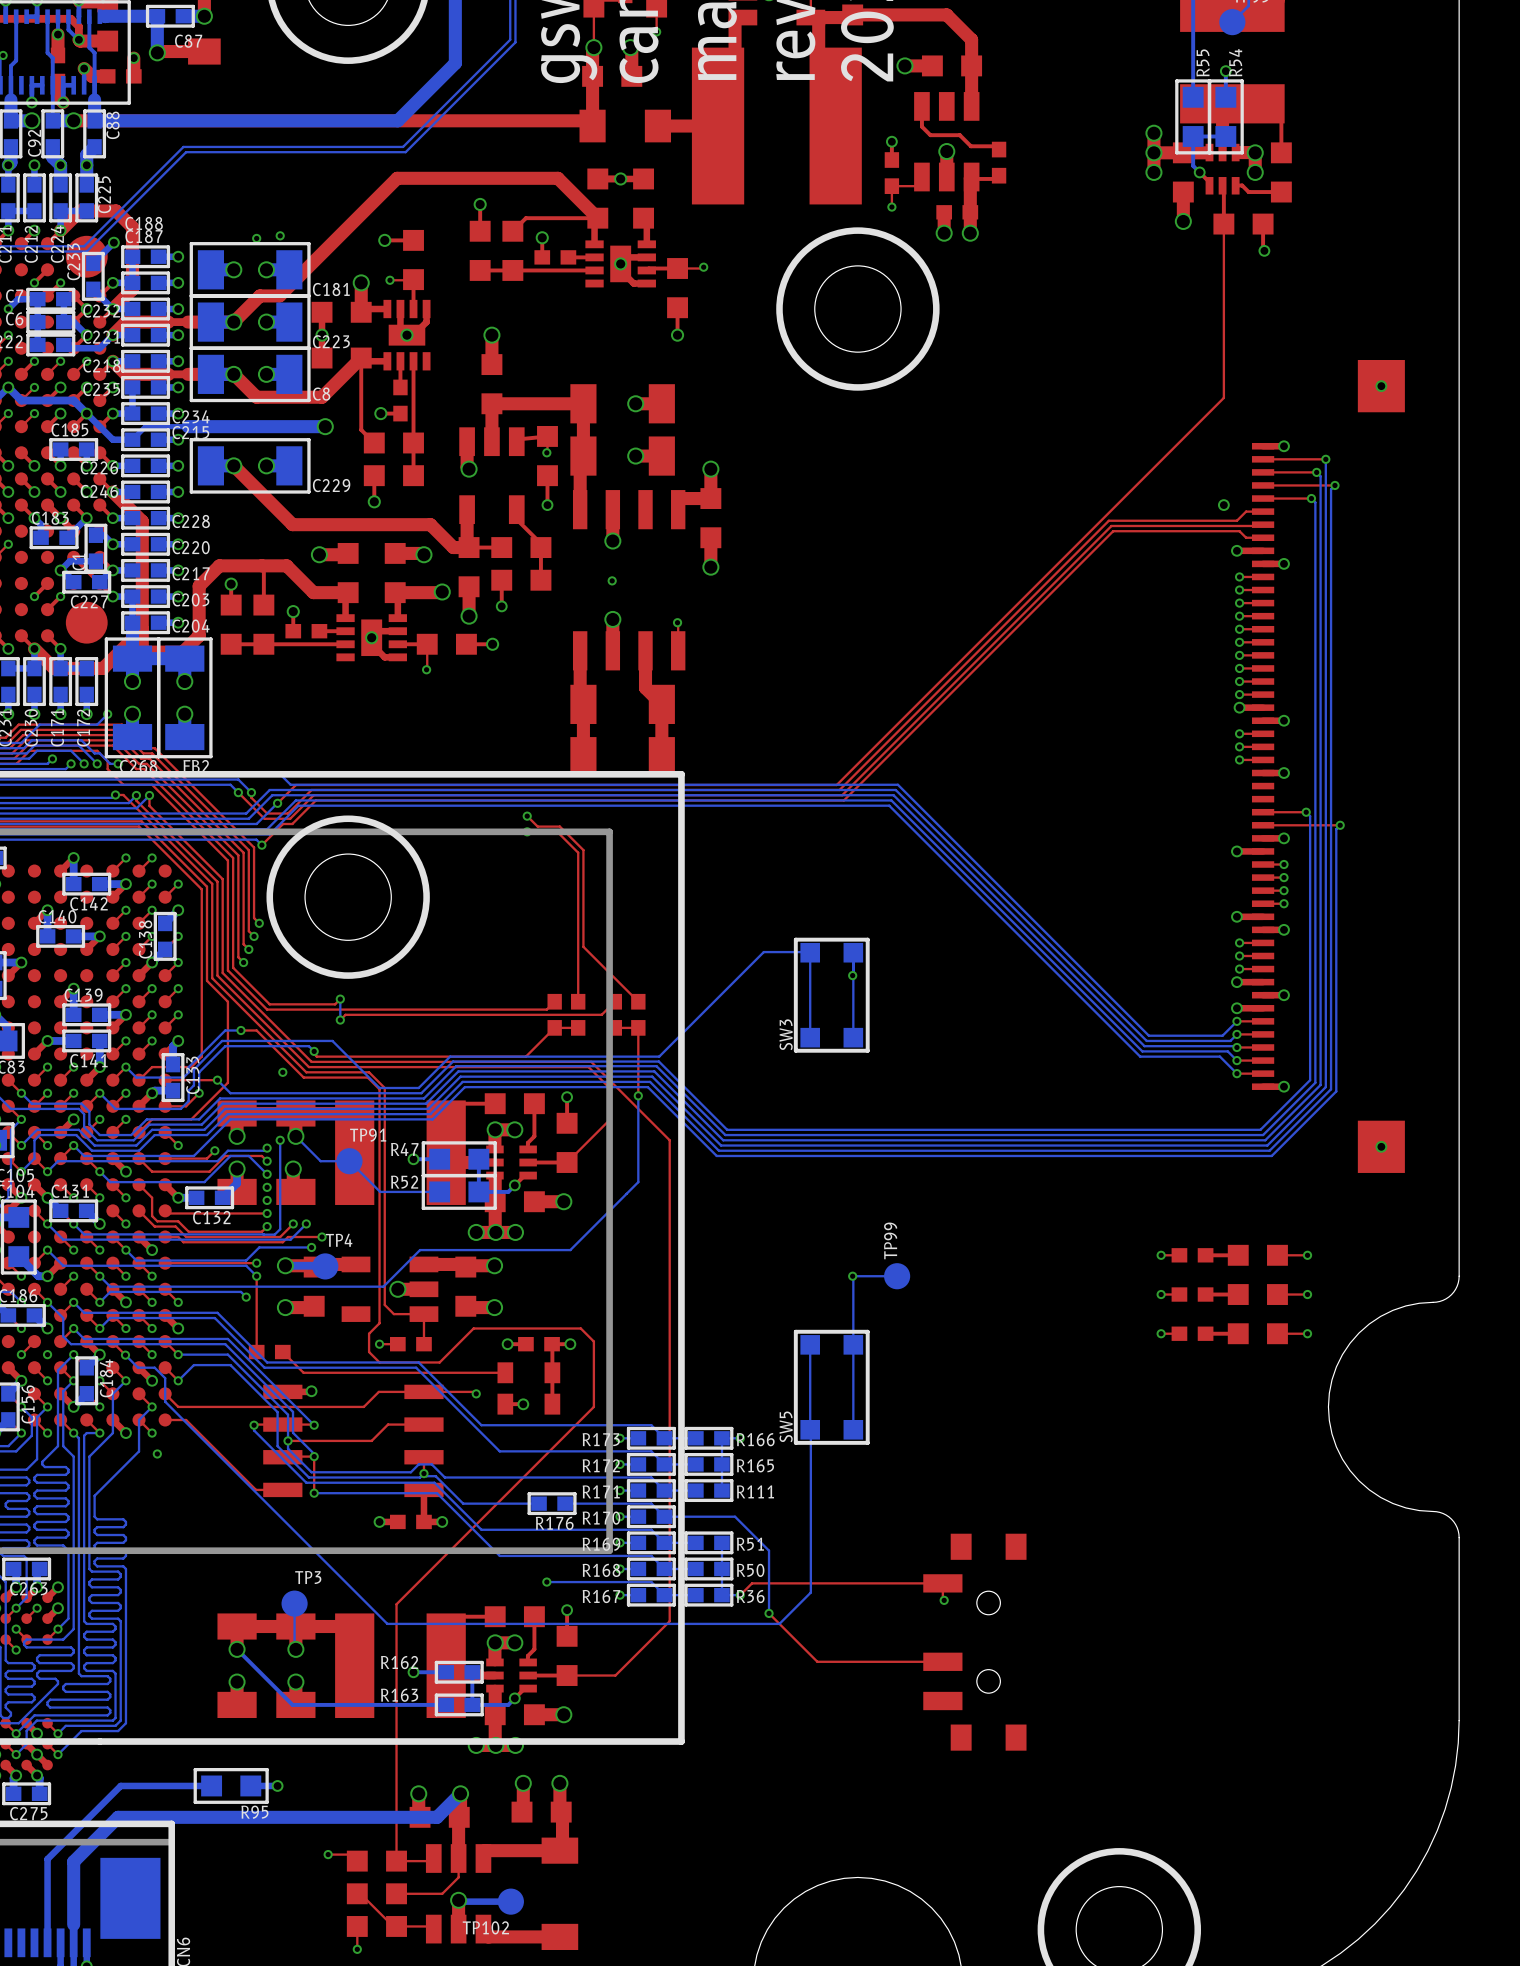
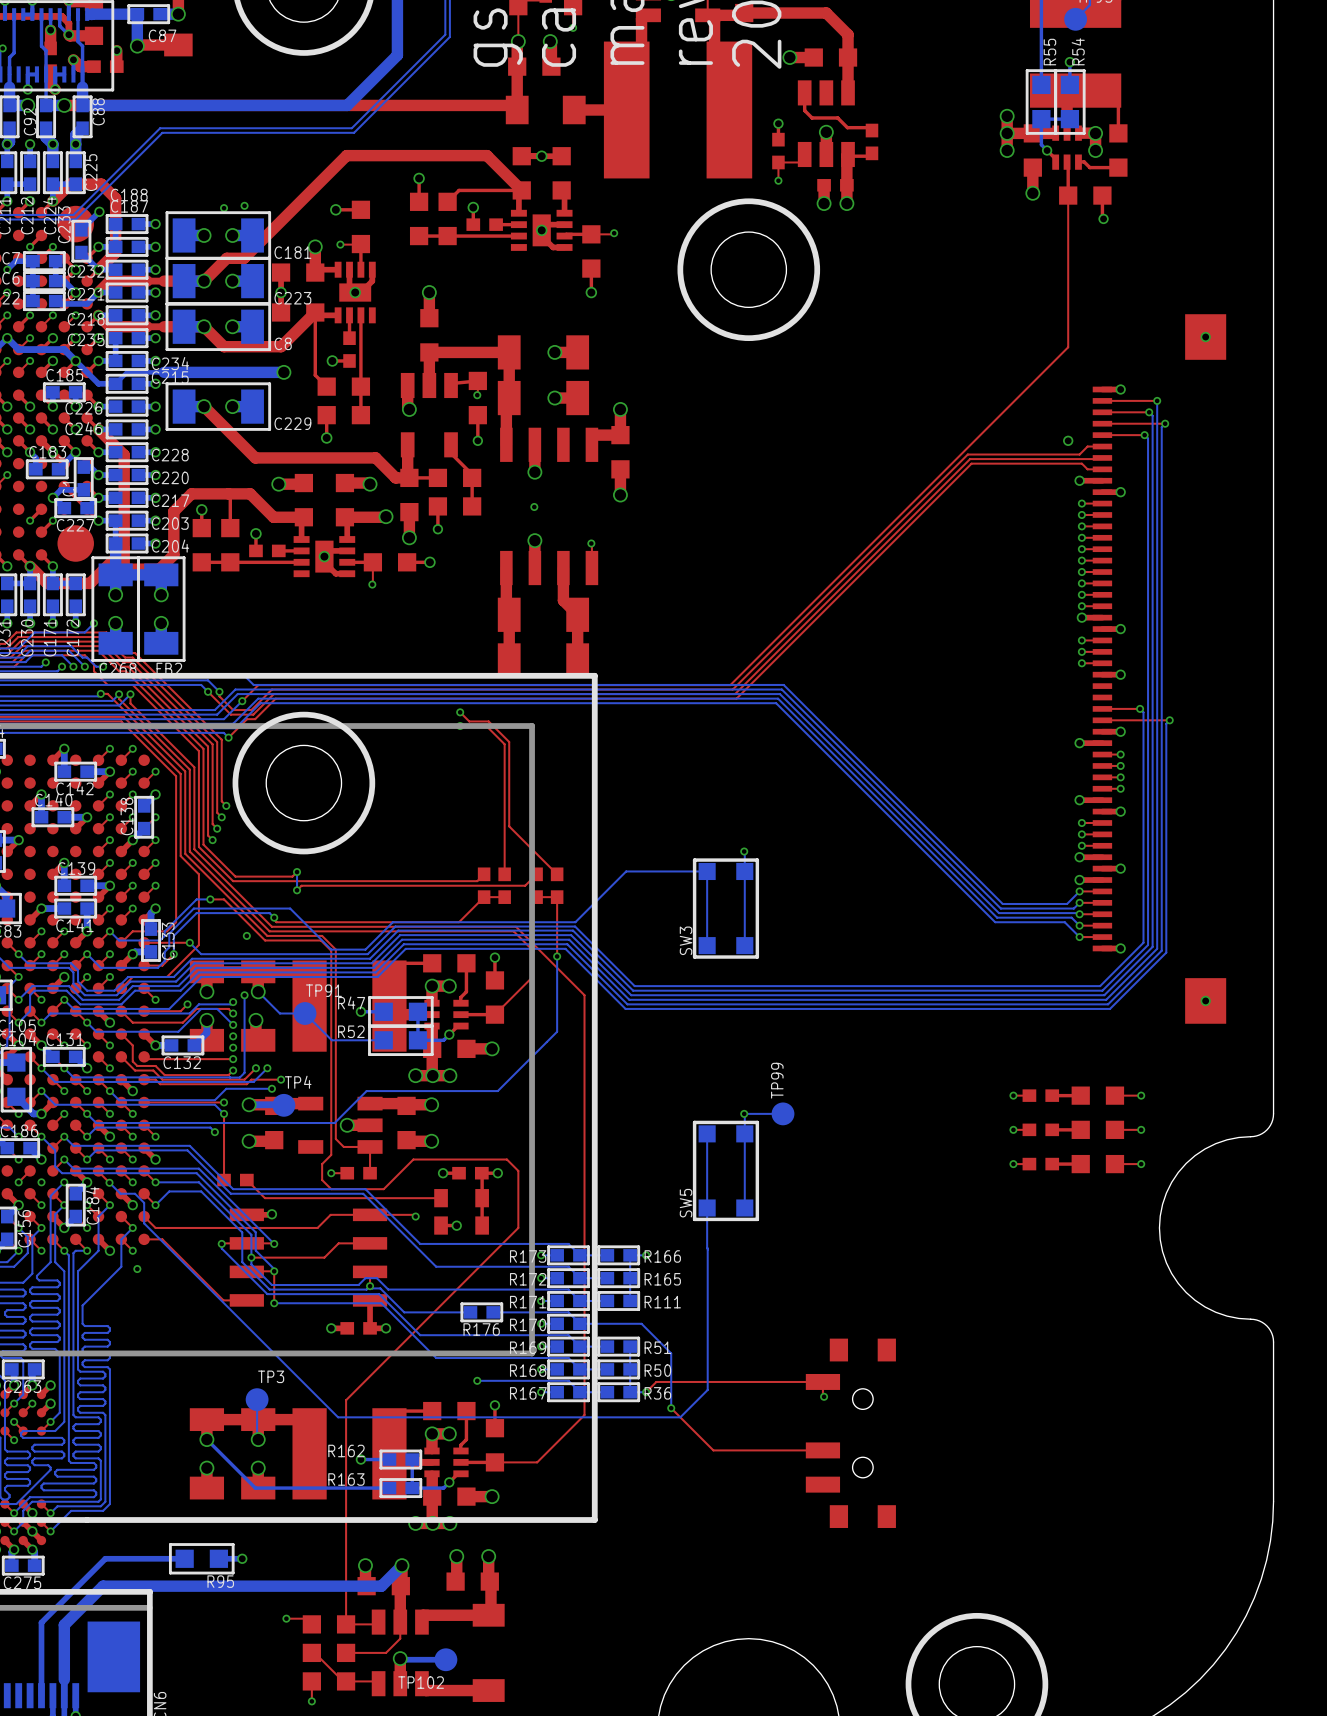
SW3 position: (831, 995) -> (725, 908)
bottom track: (810, 998) (809, 952) (763, 952) (717, 998) -> (707, 871) (626, 871)
bottom track: none -> (707, 905) (707, 945)
bottom track: none -> (744, 905) (744, 945)
bottom track: (853, 1384) (853, 1429) -> (707, 1133) (707, 1173)
SW5 position: (831, 1387) -> (725, 1170)

